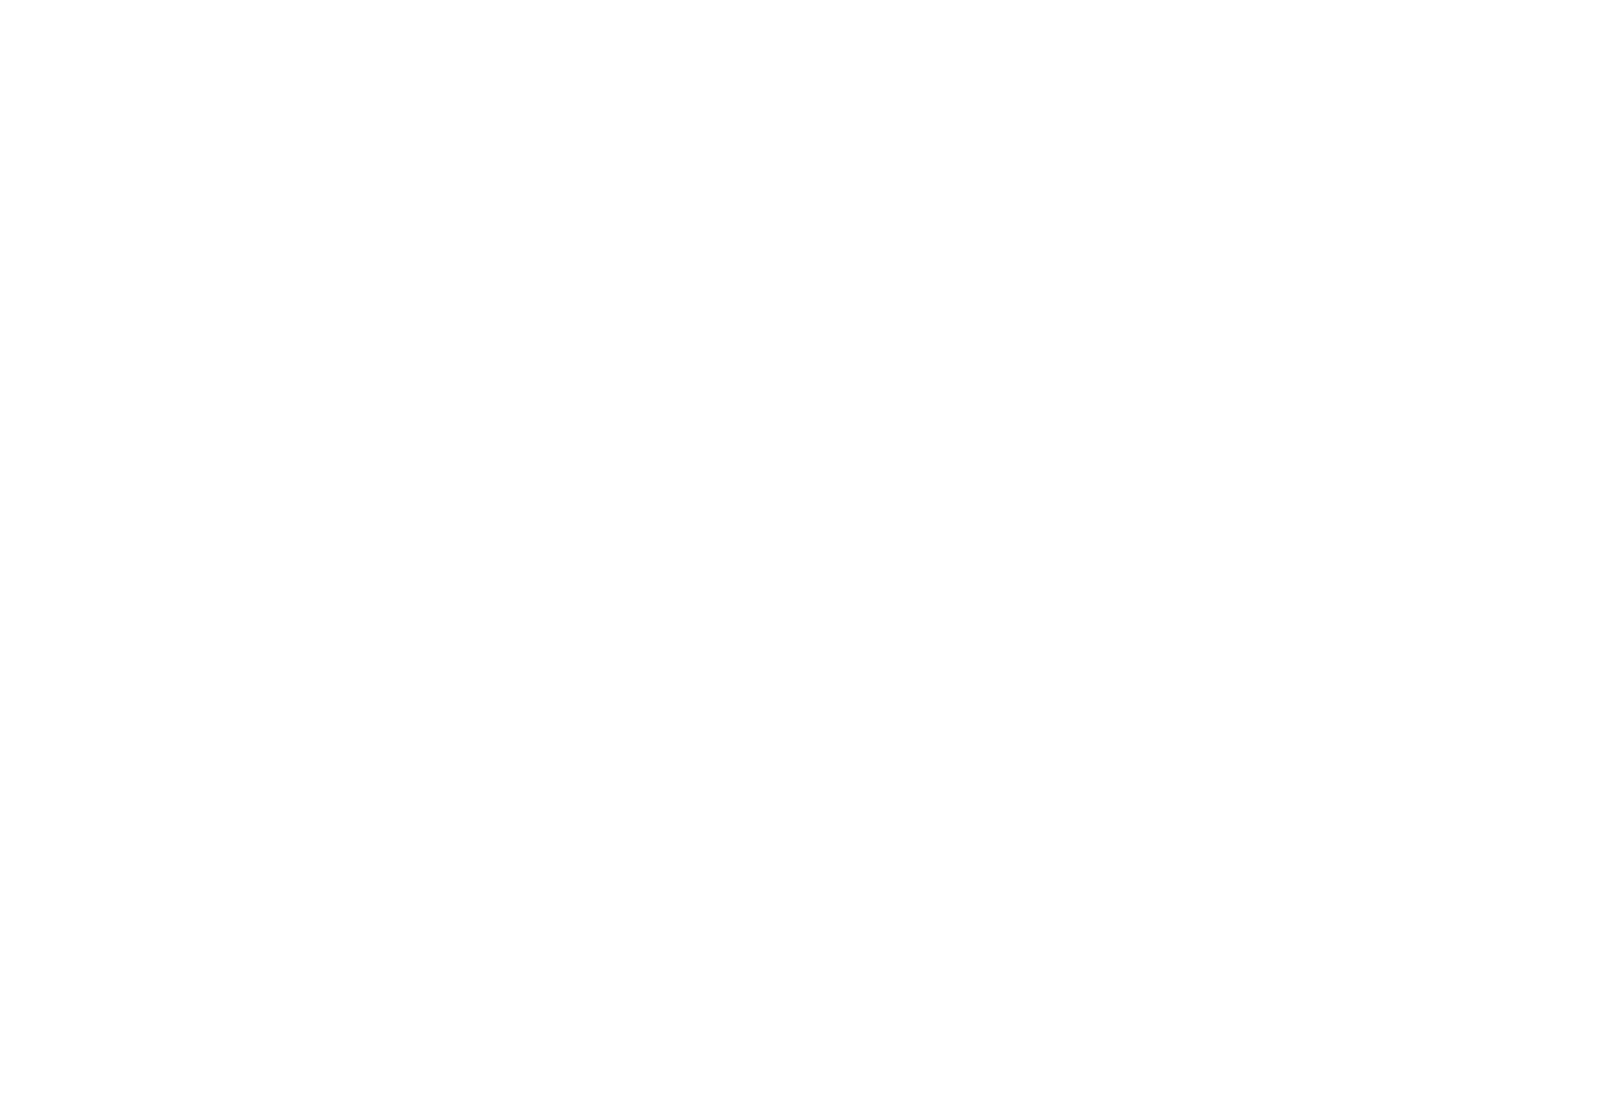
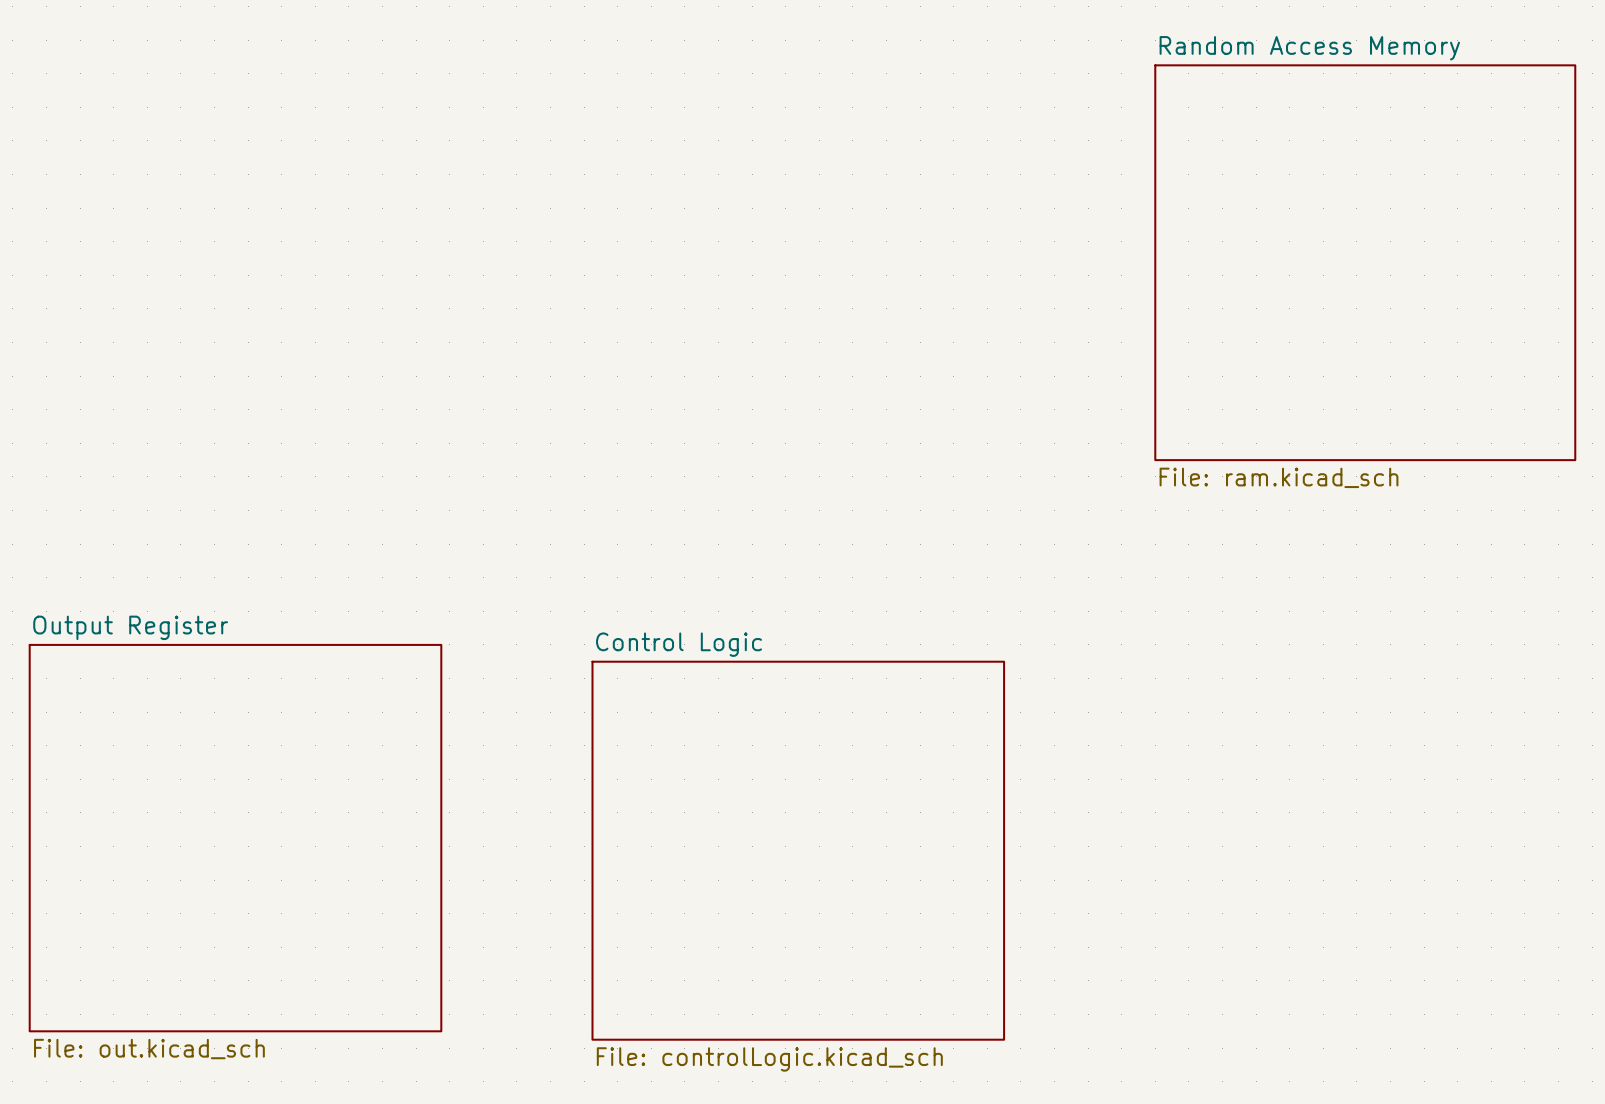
sheet Random Access Memory: none -> File: ram.kicad_sch (1365, 262)
sheet Output Register: none -> File: out.kicad_sch (235, 838)
sheet Control Logic: none -> File: controlLogic.kicad_sch (798, 850)

